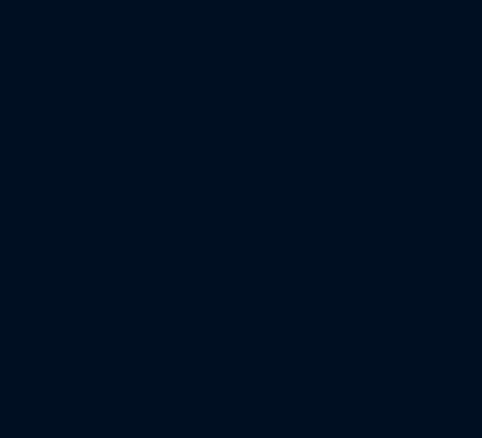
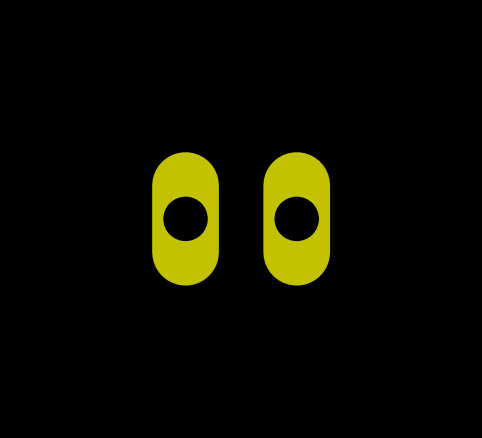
part: none -> (241, 218)

